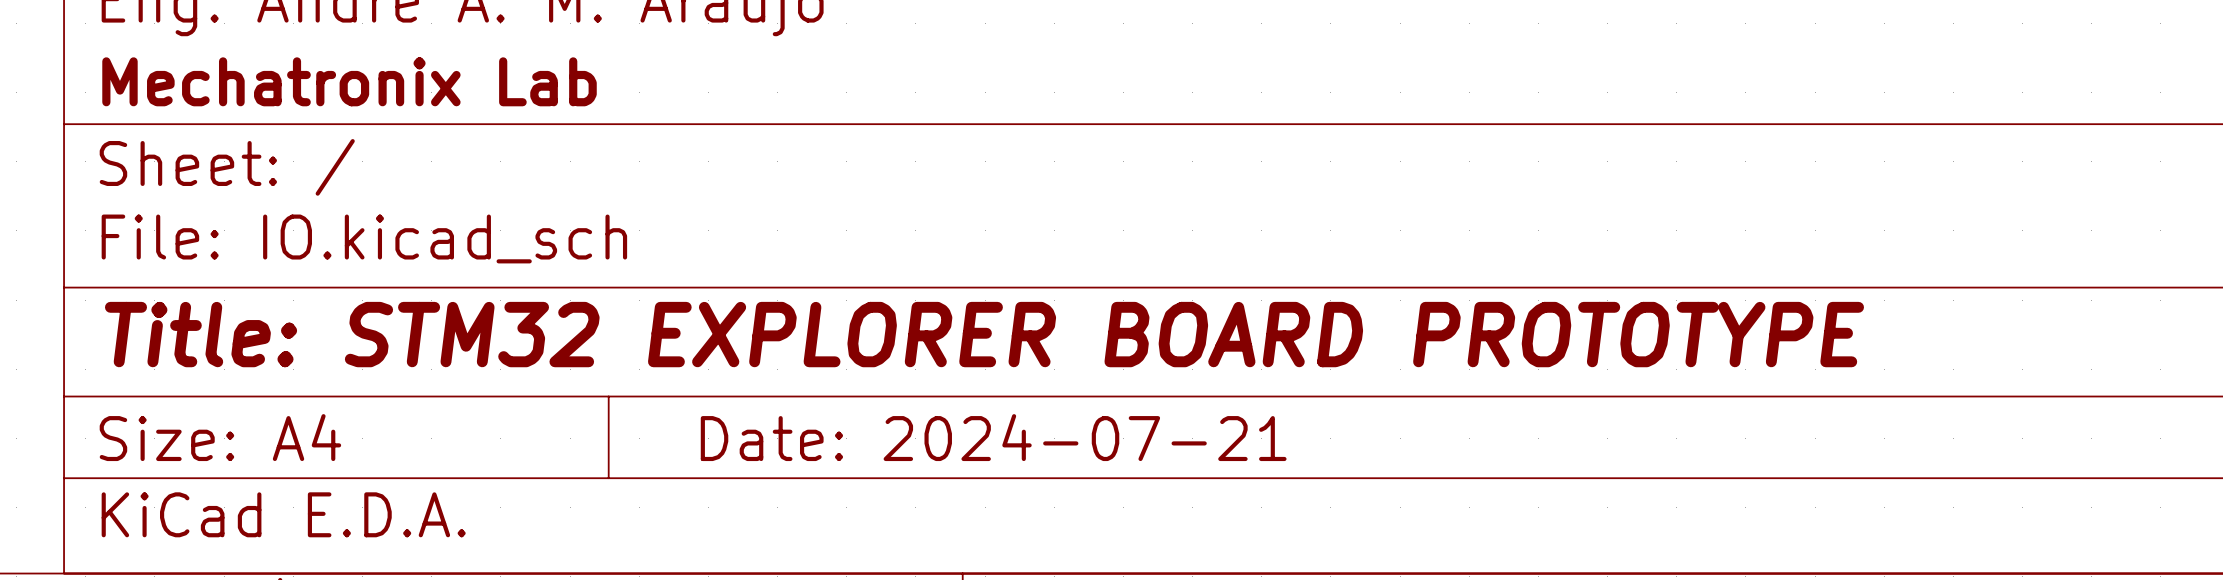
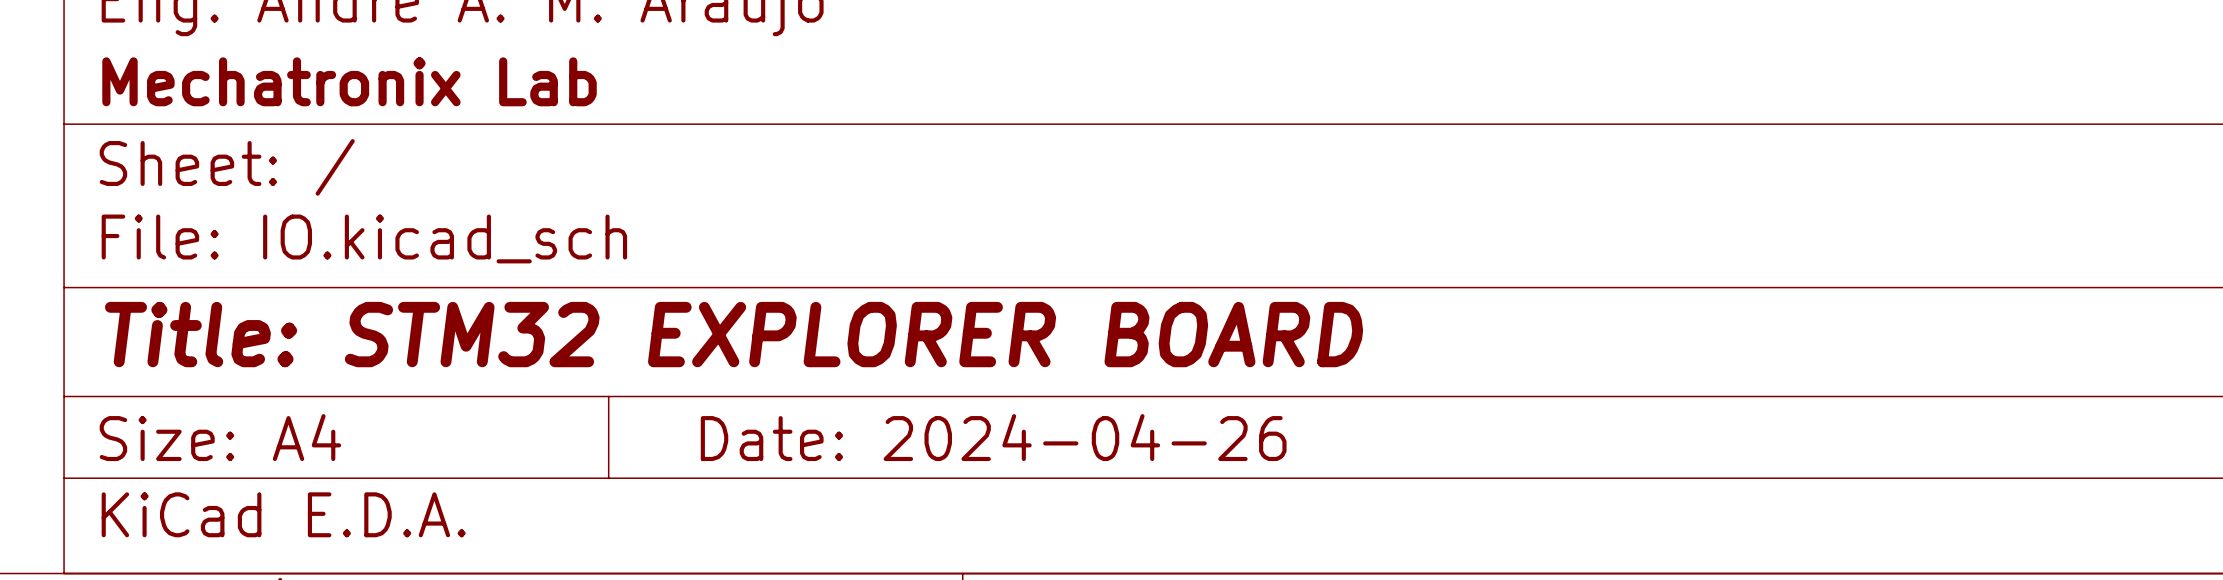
title block: Title: STM32 EXPLORER BOARD PROTOTYPE (984, 334) -> Title: STM32 EXPLORER BOARD (734, 334)
title block: Date: 2024-07-21 (993, 437) -> Date: 2024-04-26 (993, 437)

